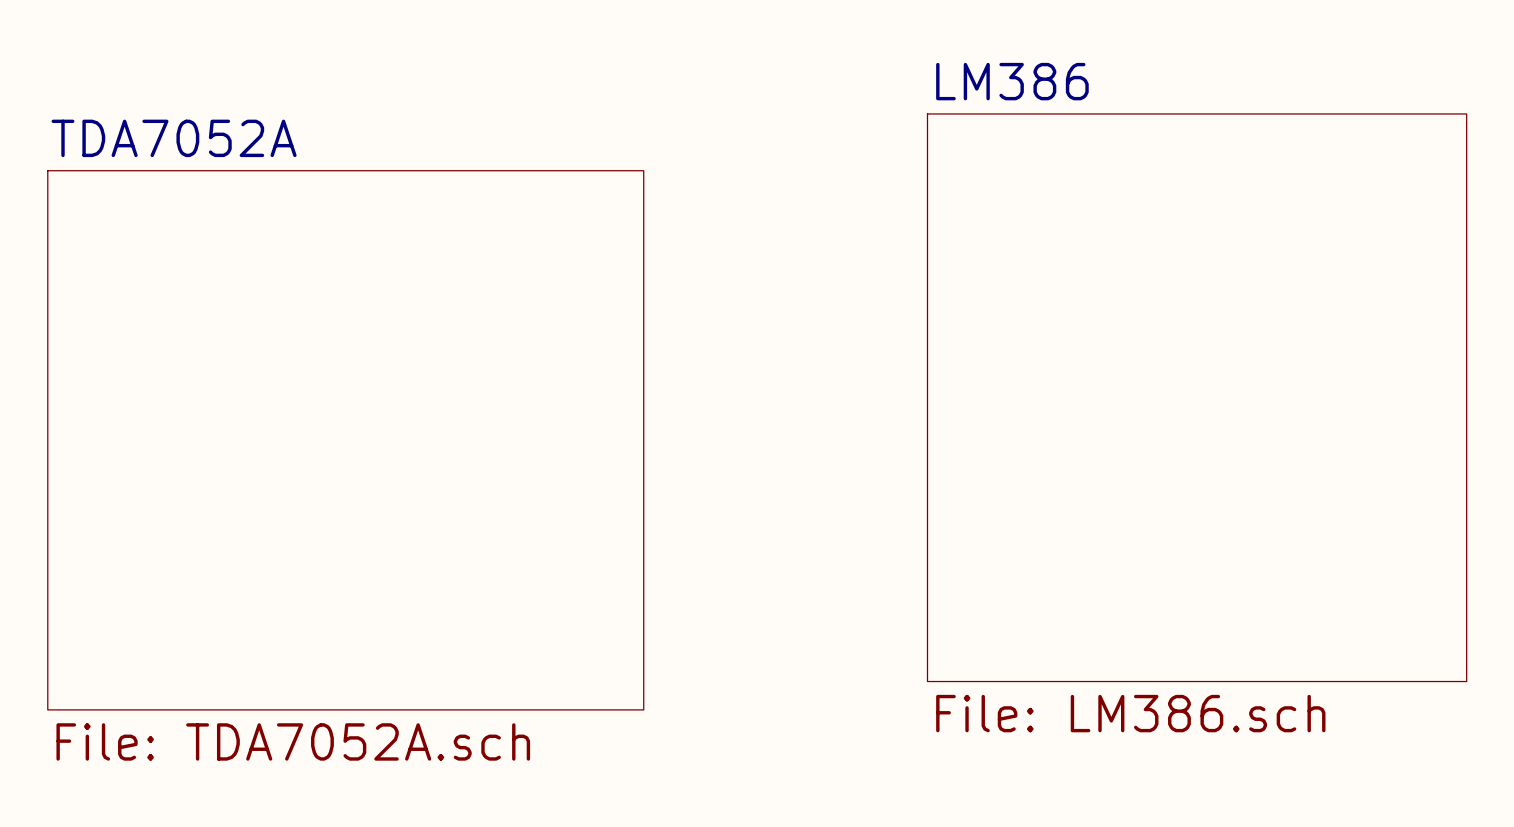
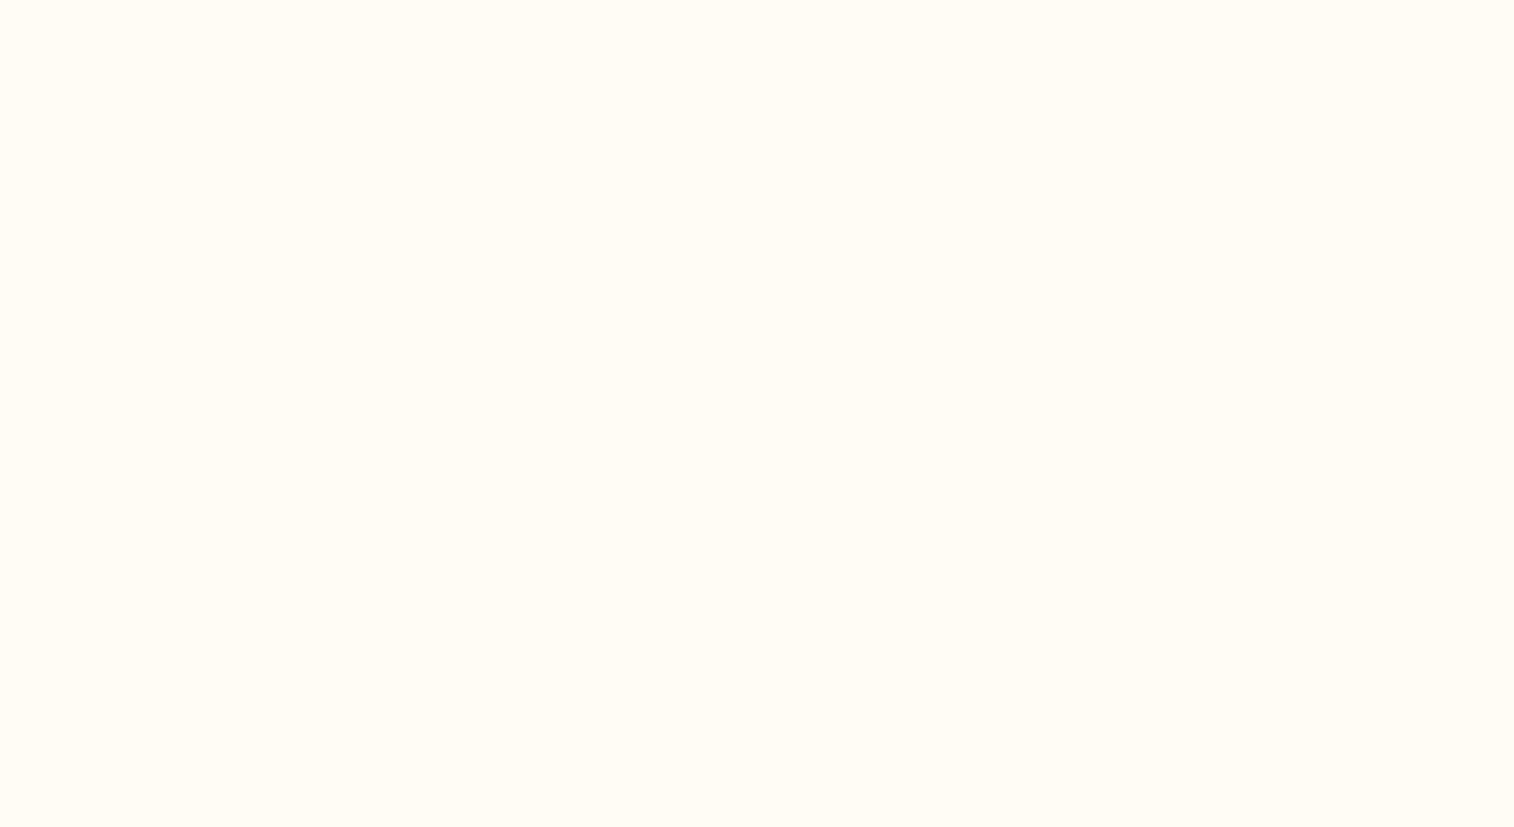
sheet LM386: File: LM386.sch (1197, 397) -> none
sheet TDA7052A: File: TDA7052A.sch (345, 440) -> none

